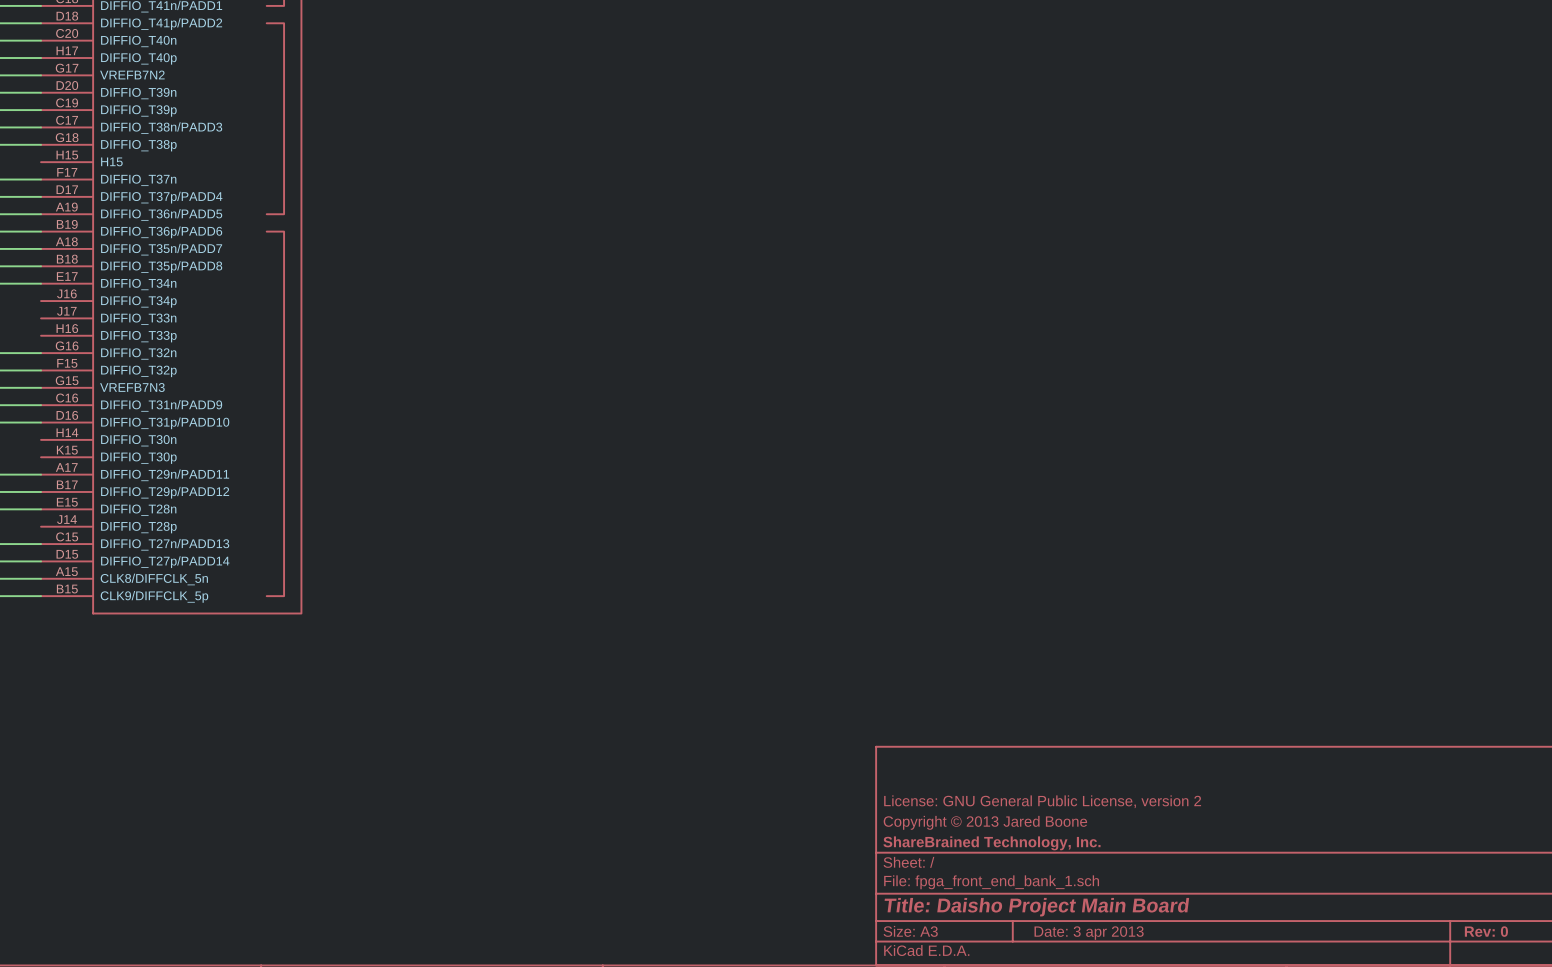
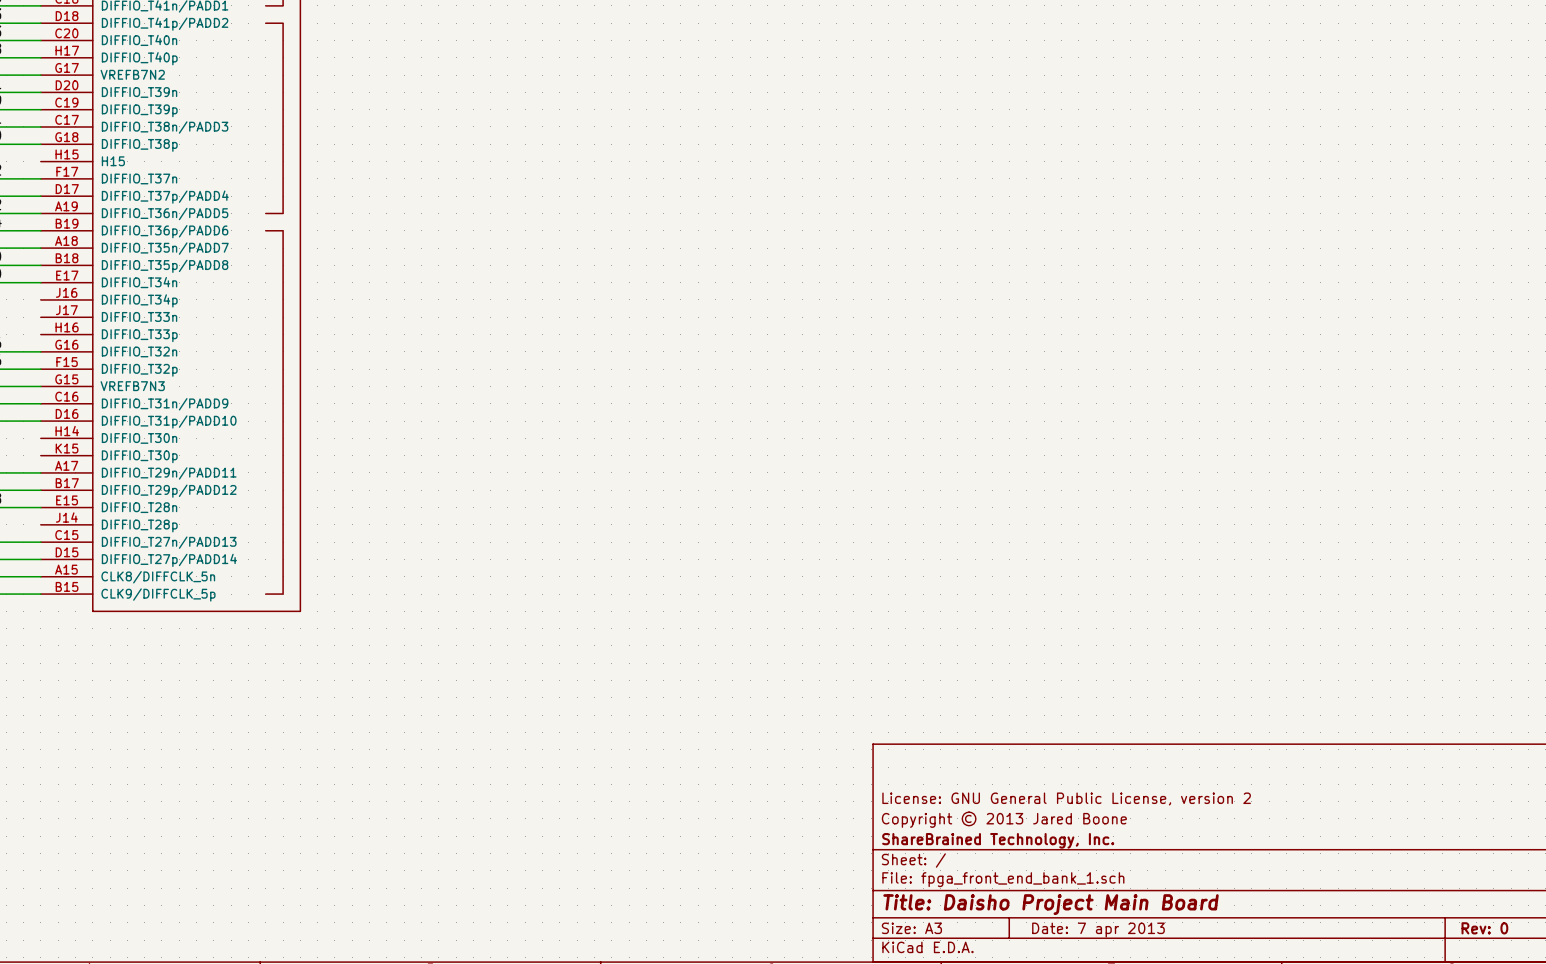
title block: Date: 3 apr 2013 (1089, 933) -> Date: 7 apr 2013 (1098, 930)

